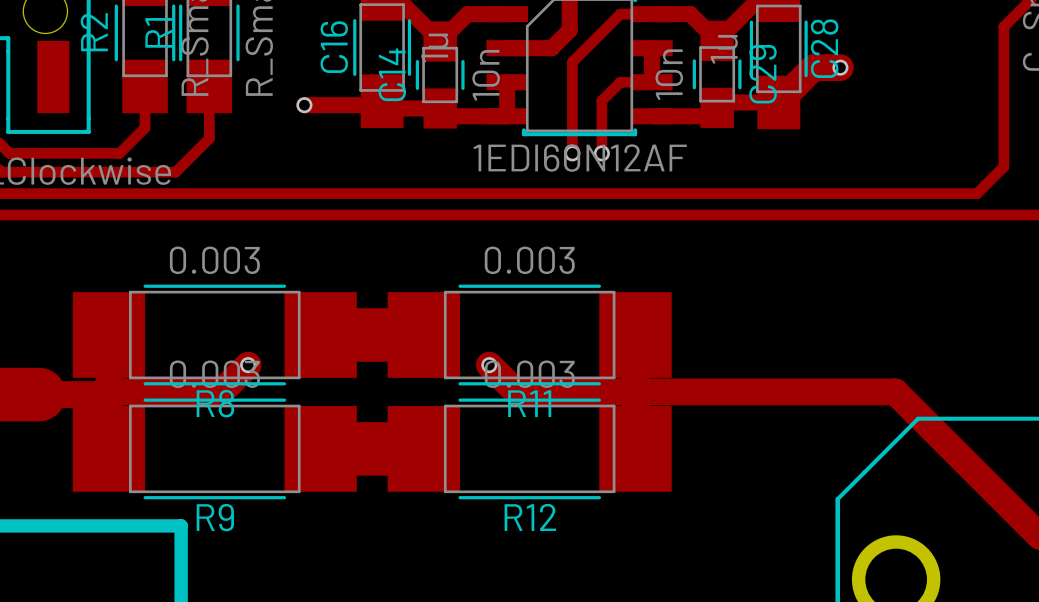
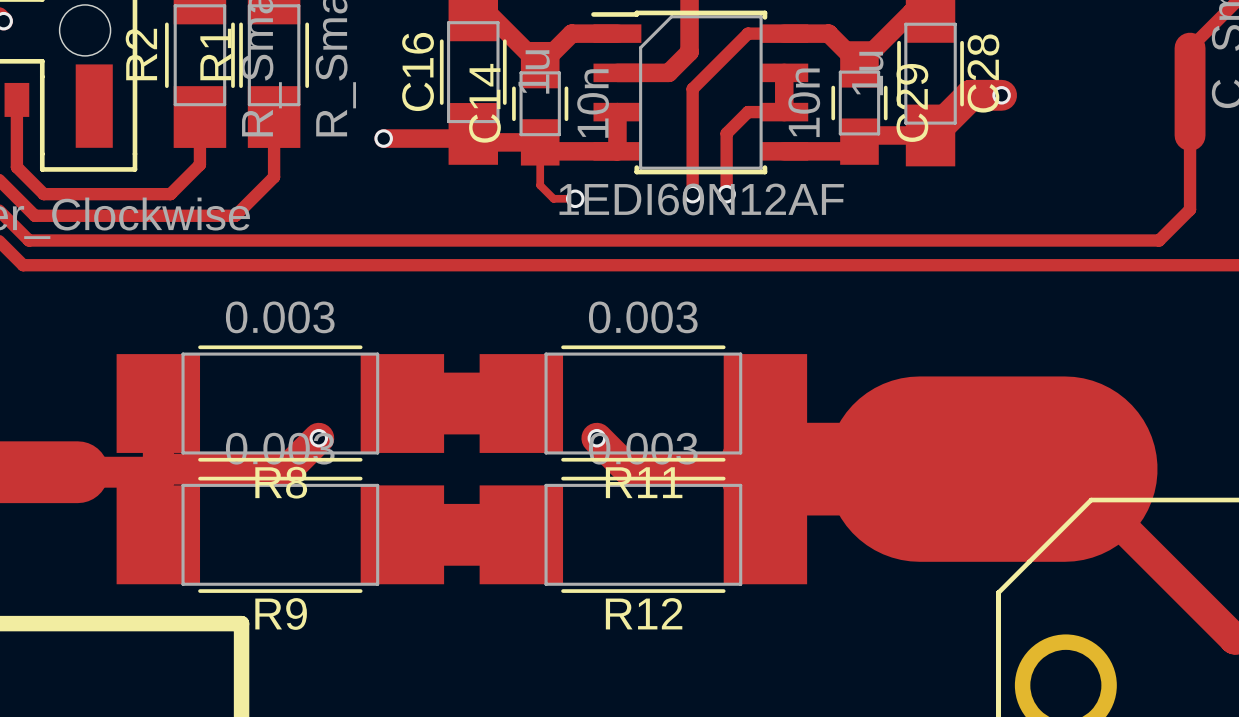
track width: thin (1003, 26) (1003, 102) -> thick (1190, 48) (1190, 135)
track: none -> (540, 142) (540, 185) (553, 198) (575, 198)
via: none -> (575, 198)
track width: thin (635, 391) (895, 391) -> thick (765, 469) (1064, 469)

